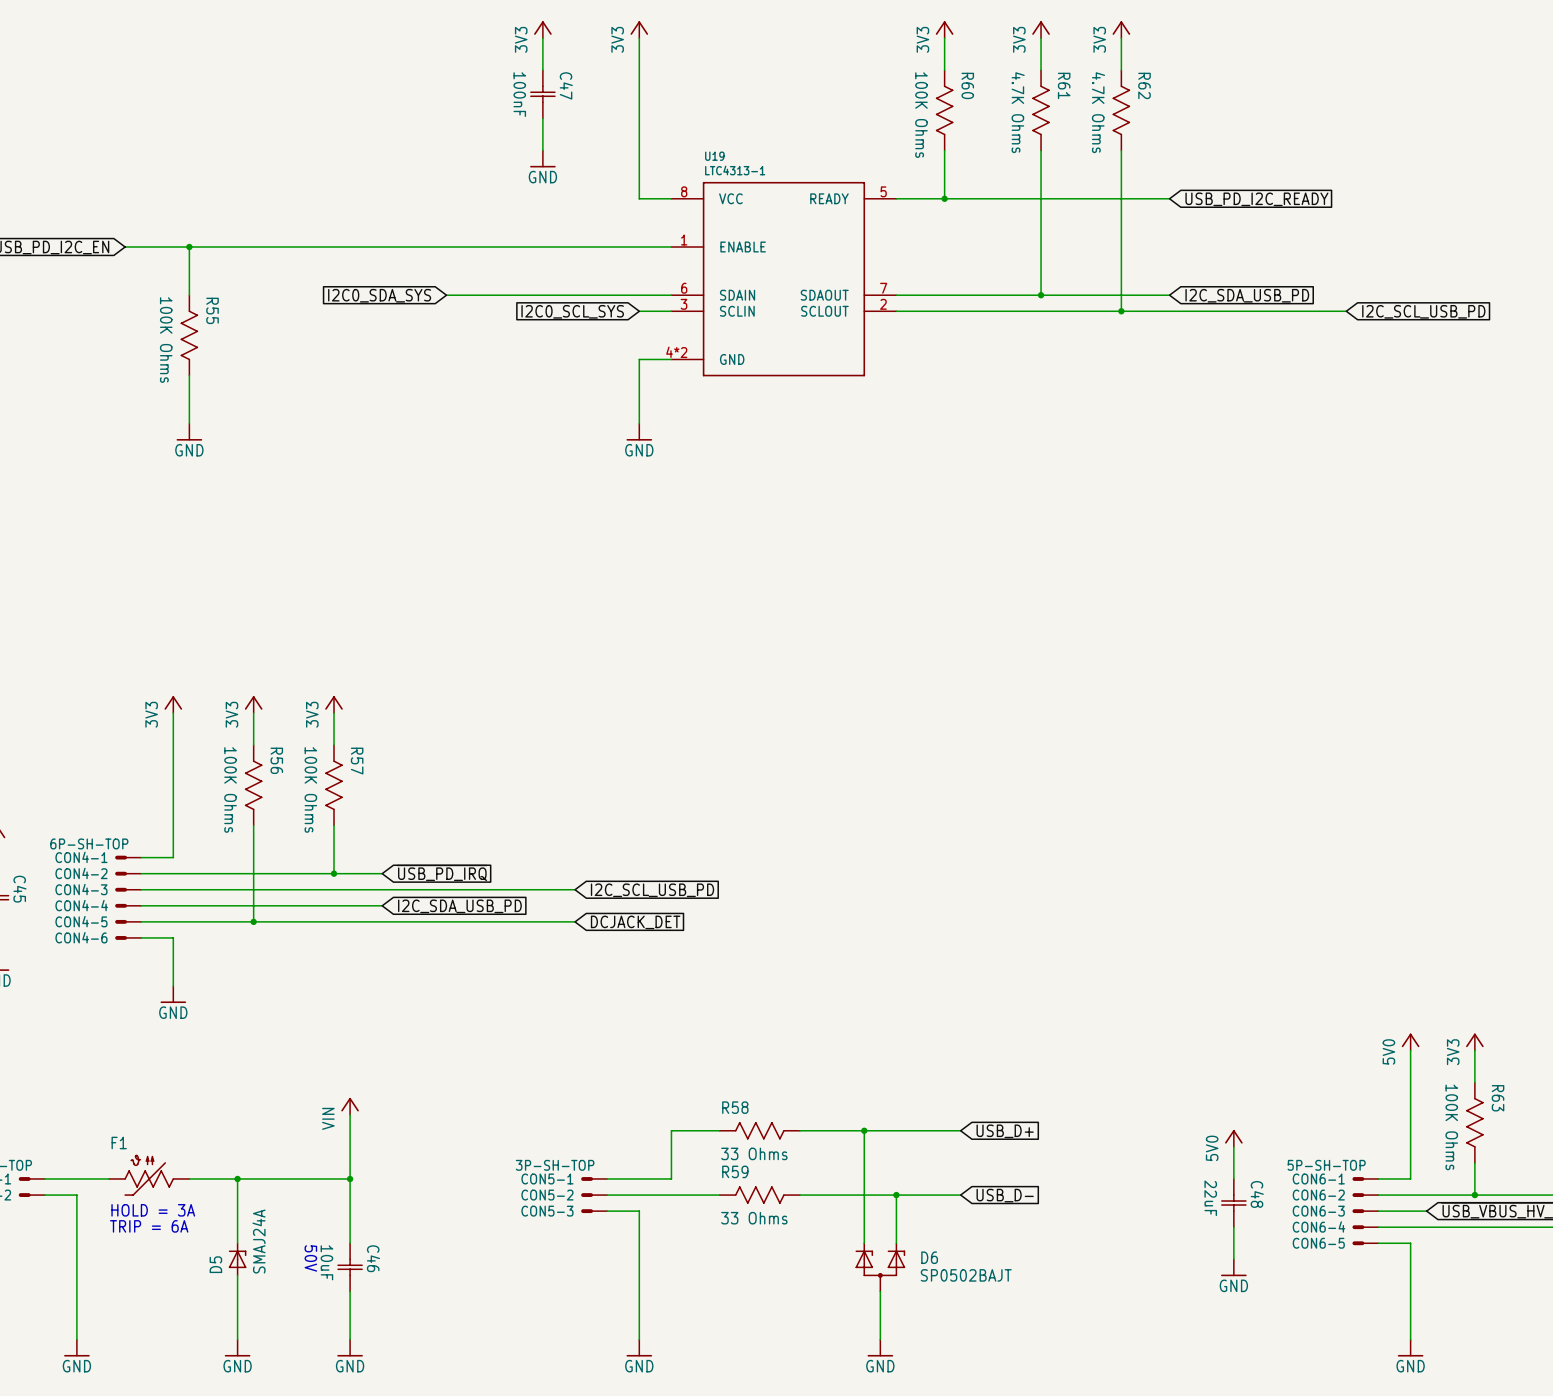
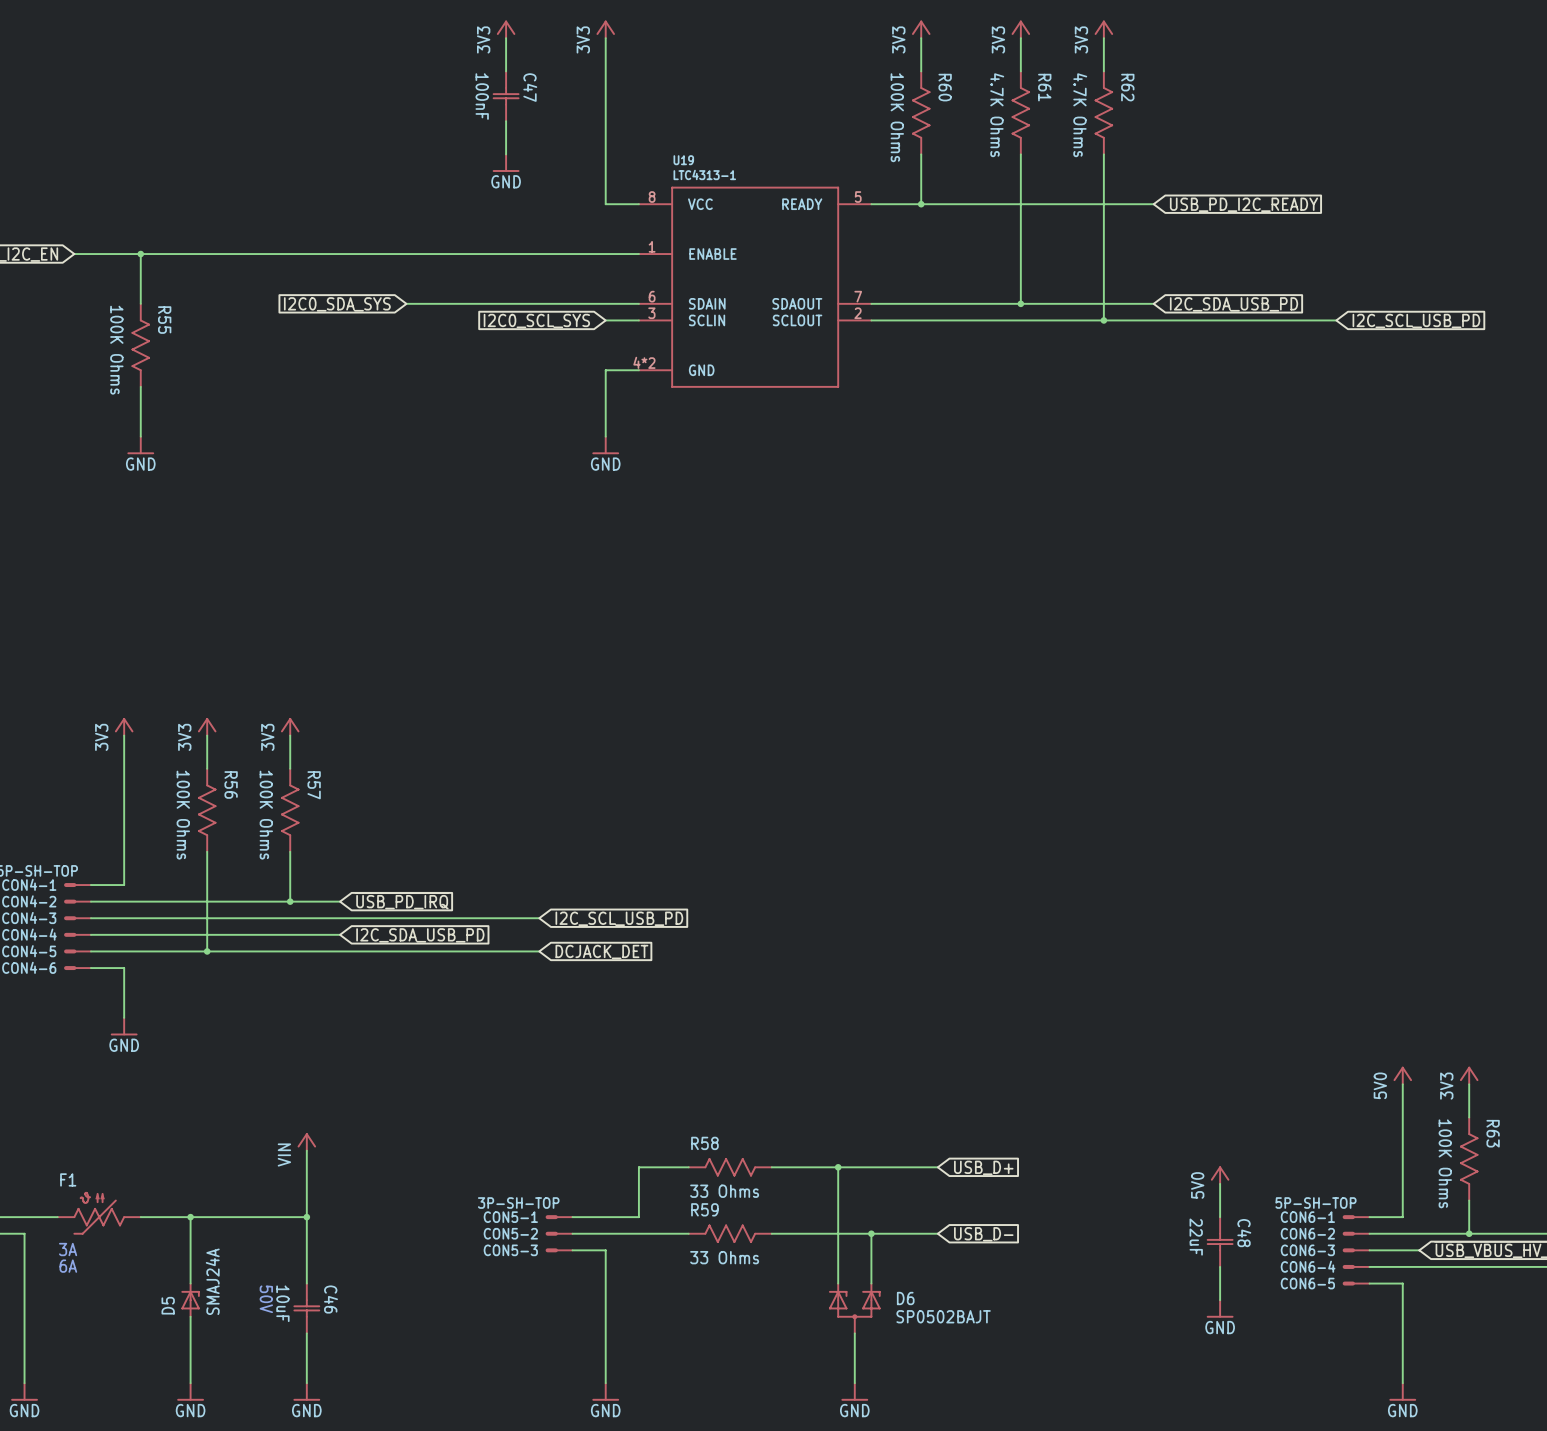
F1 text: HOLD = 3A (153, 1210) -> 3A (68, 1249)
F1 text: TRIP = 6A (149, 1226) -> 6A (68, 1266)

